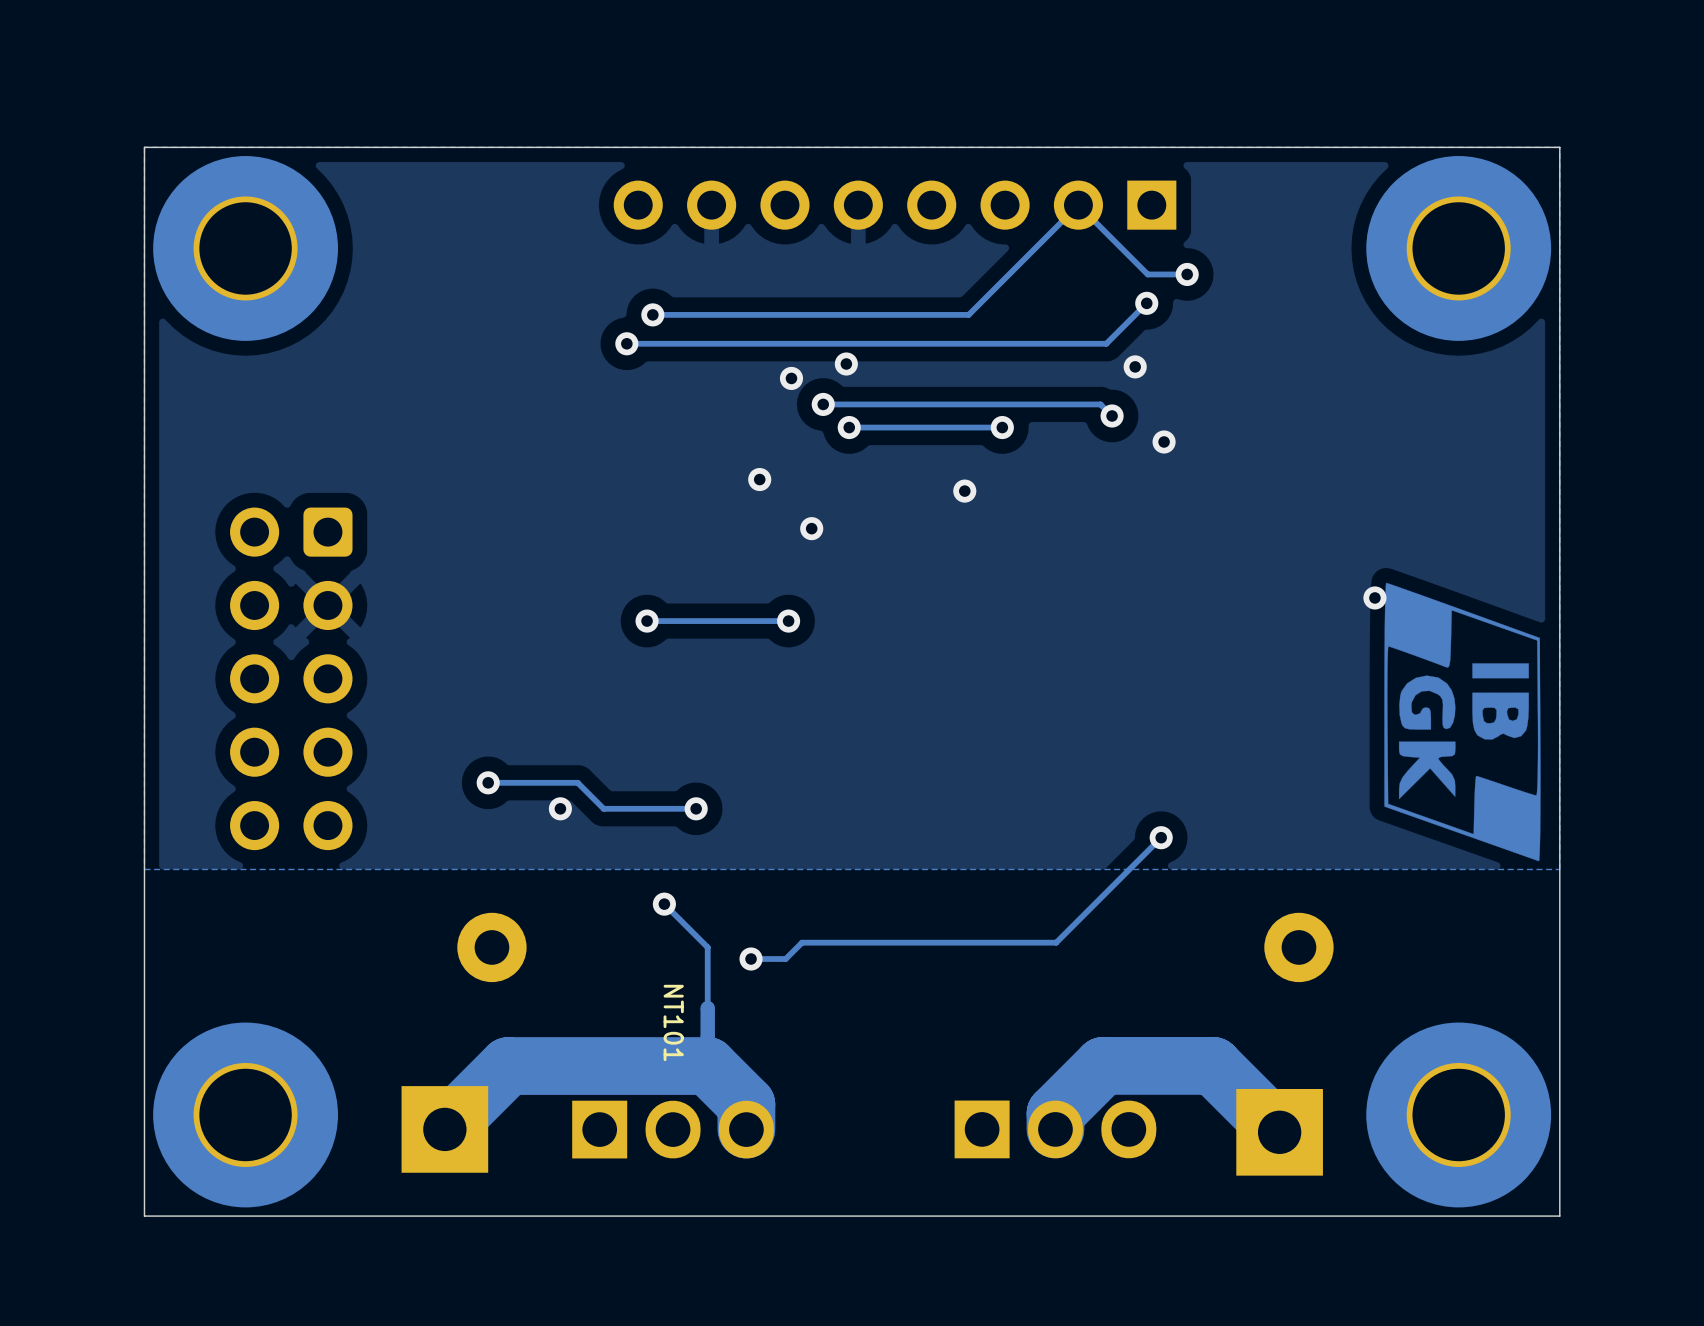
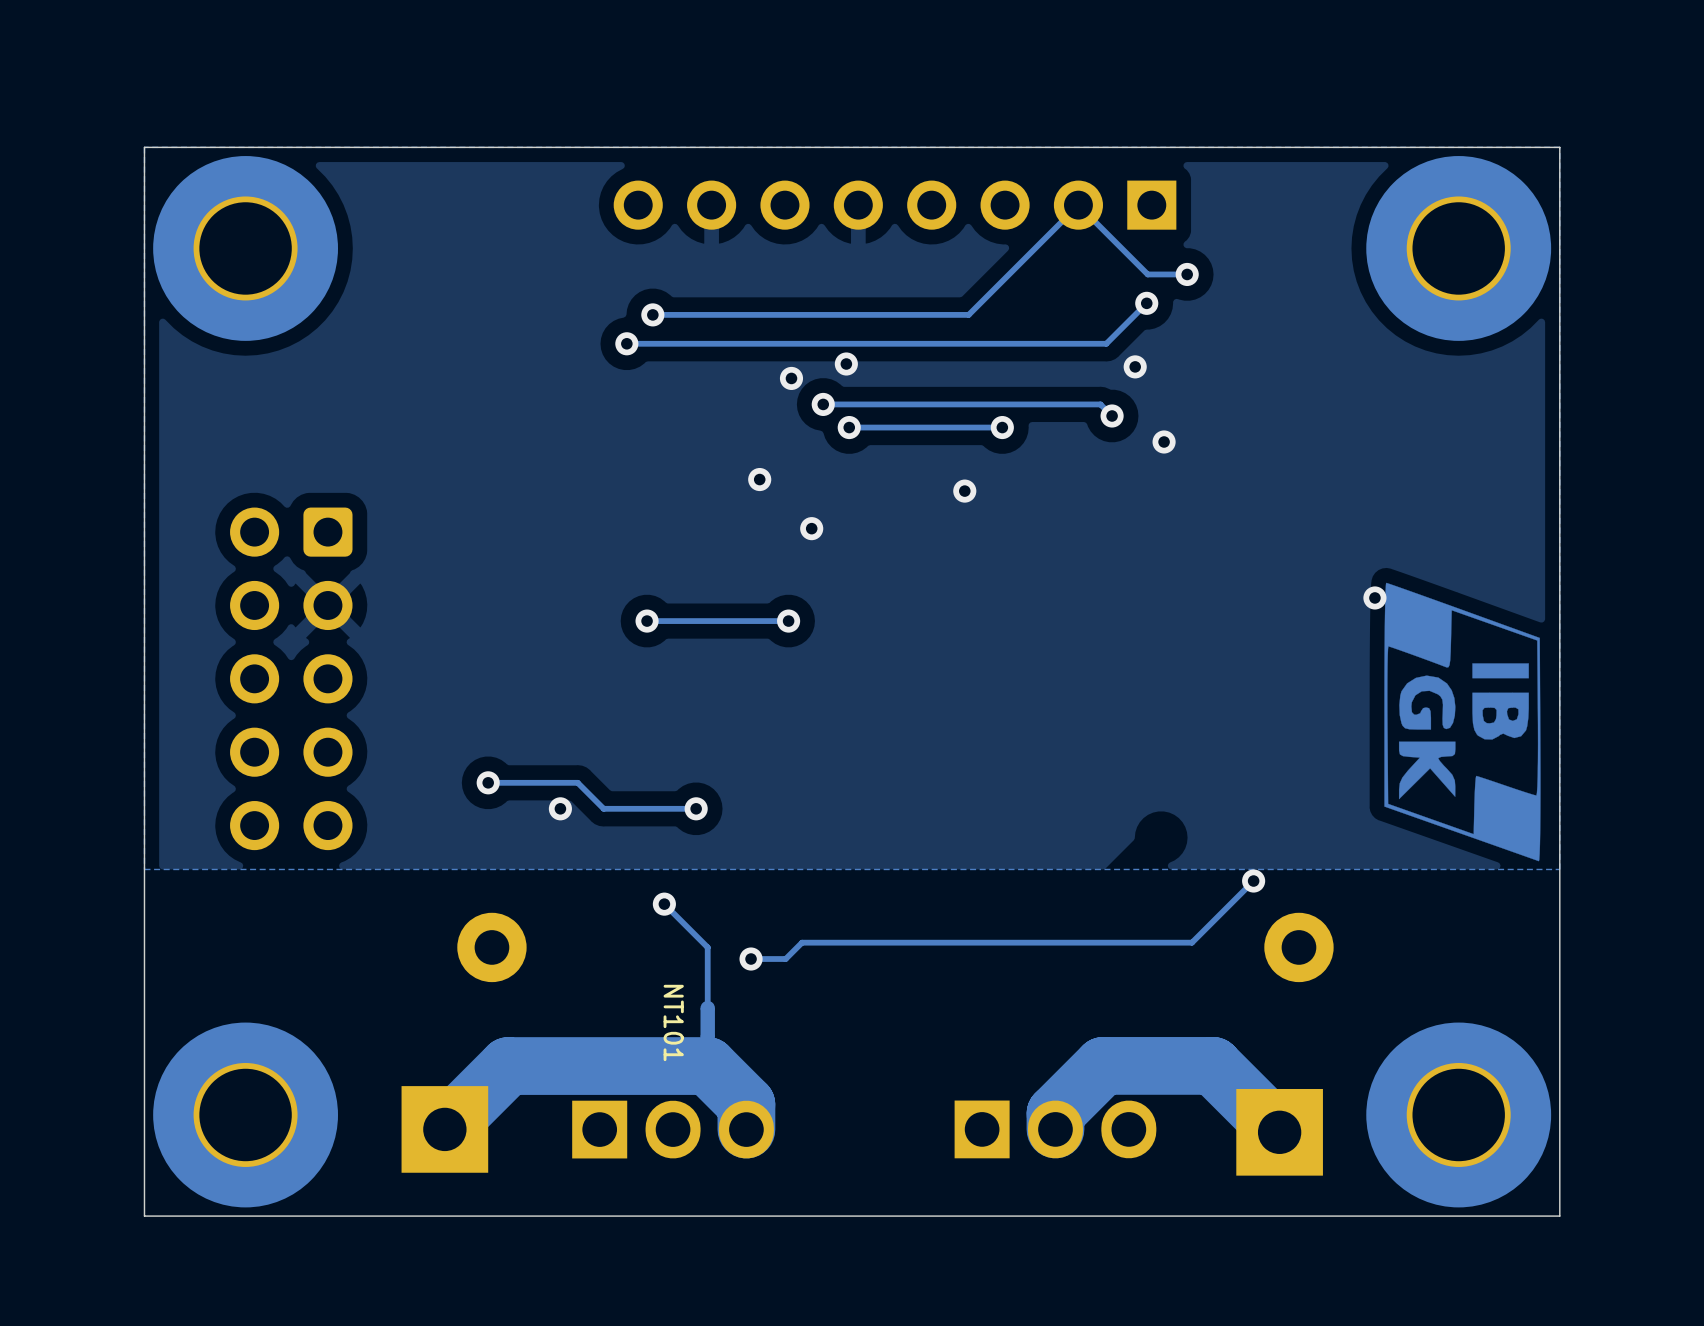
track: (1161, 837) (1056, 942) -> (1253, 881) (1191, 942) (1056, 942)
via position: (1161, 837) -> (1253, 881)

